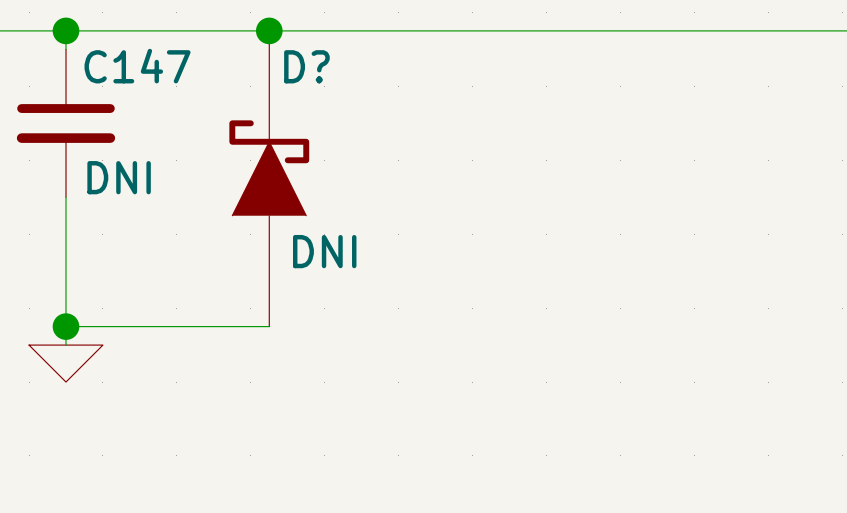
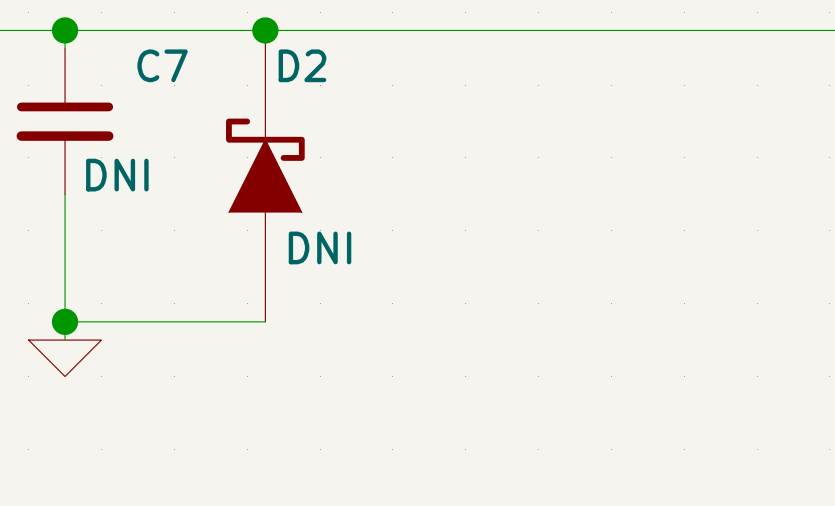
C147 name: C147 (137, 66) -> C7 (162, 65)
D? name: D? (306, 66) -> D2 (302, 65)

